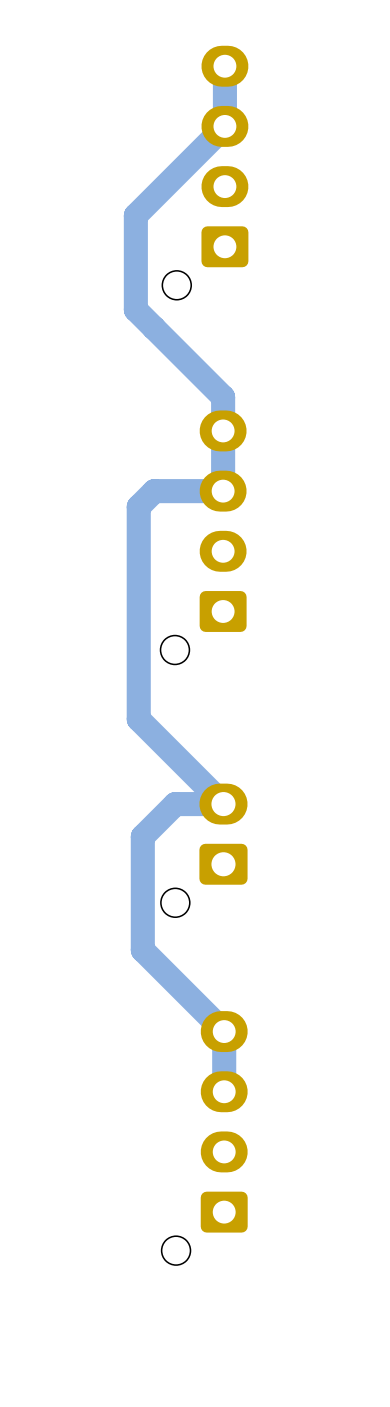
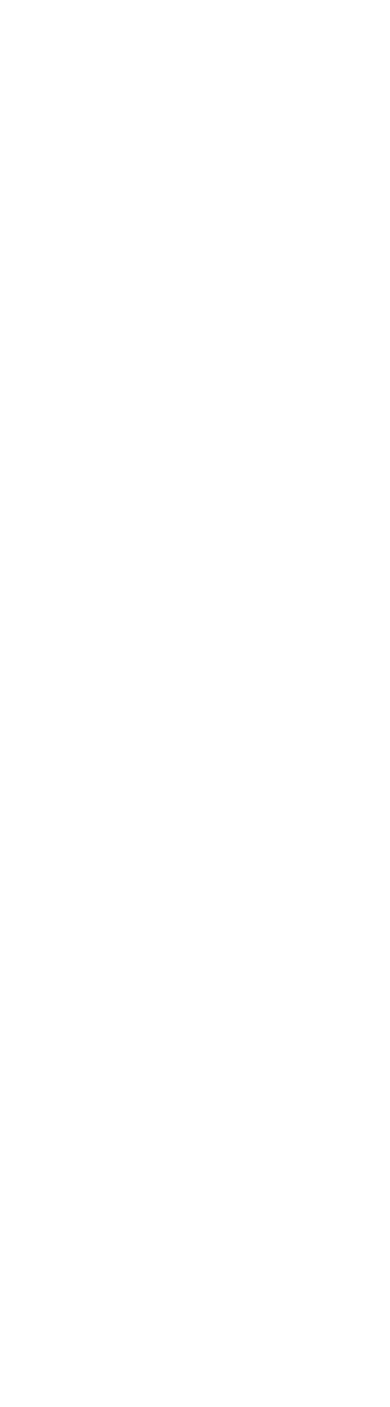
track: (224, 66) (224, 126) (135, 215) (135, 309) (223, 397) (223, 491) (154, 491) (138, 506) (138, 719) (223, 804) (175, 804) (142, 836) (142, 950) (224, 1031) (224, 1091) -> none
part: (205, 172) -> none
part: (203, 537) -> none
part: (204, 850) -> none
part: (204, 1138) -> none

